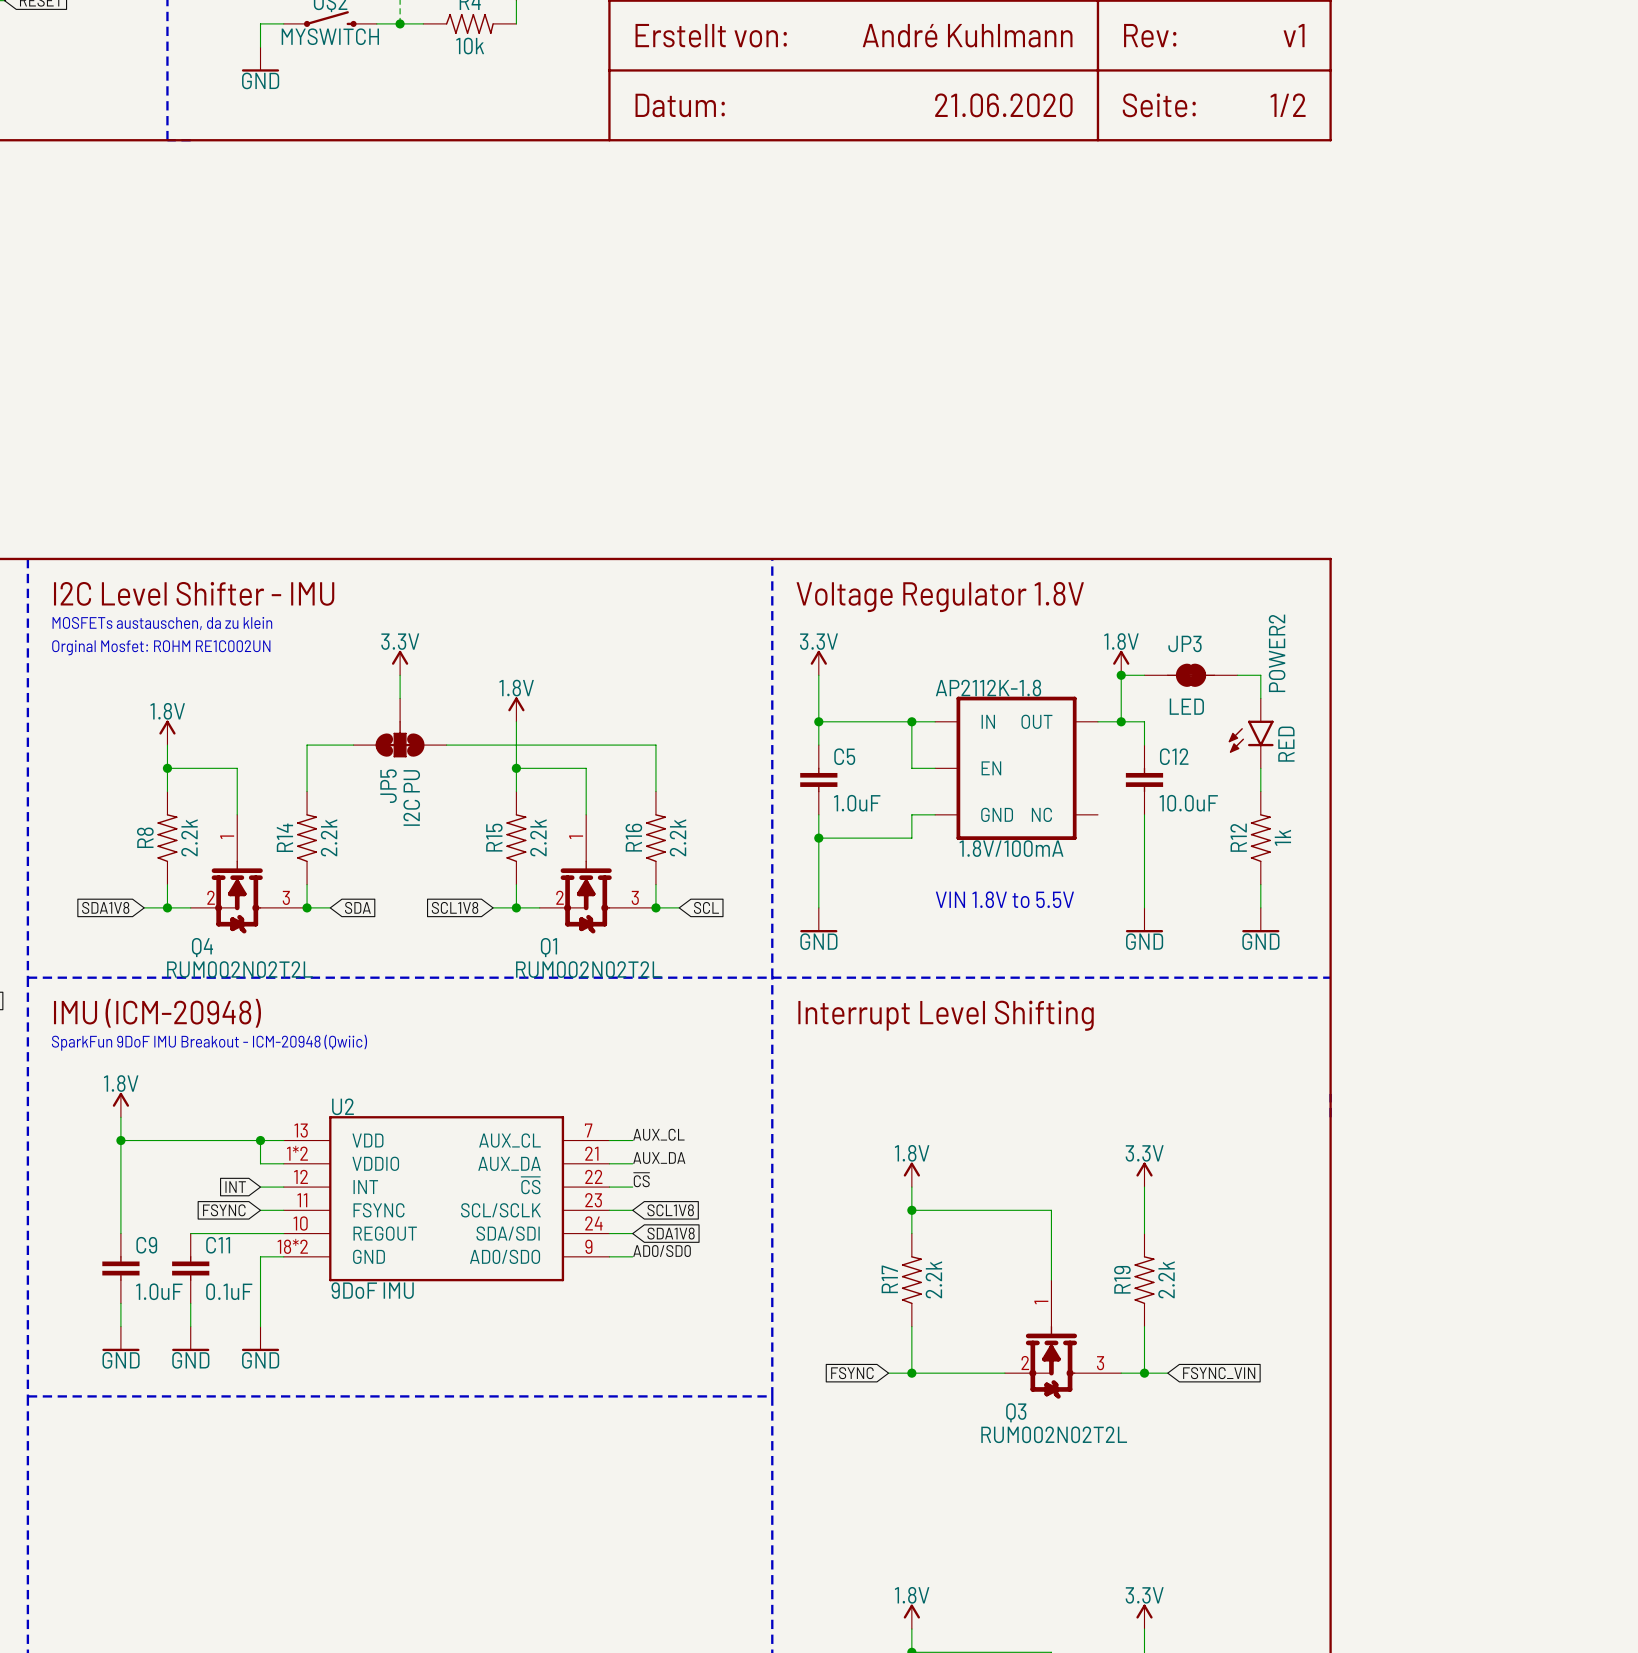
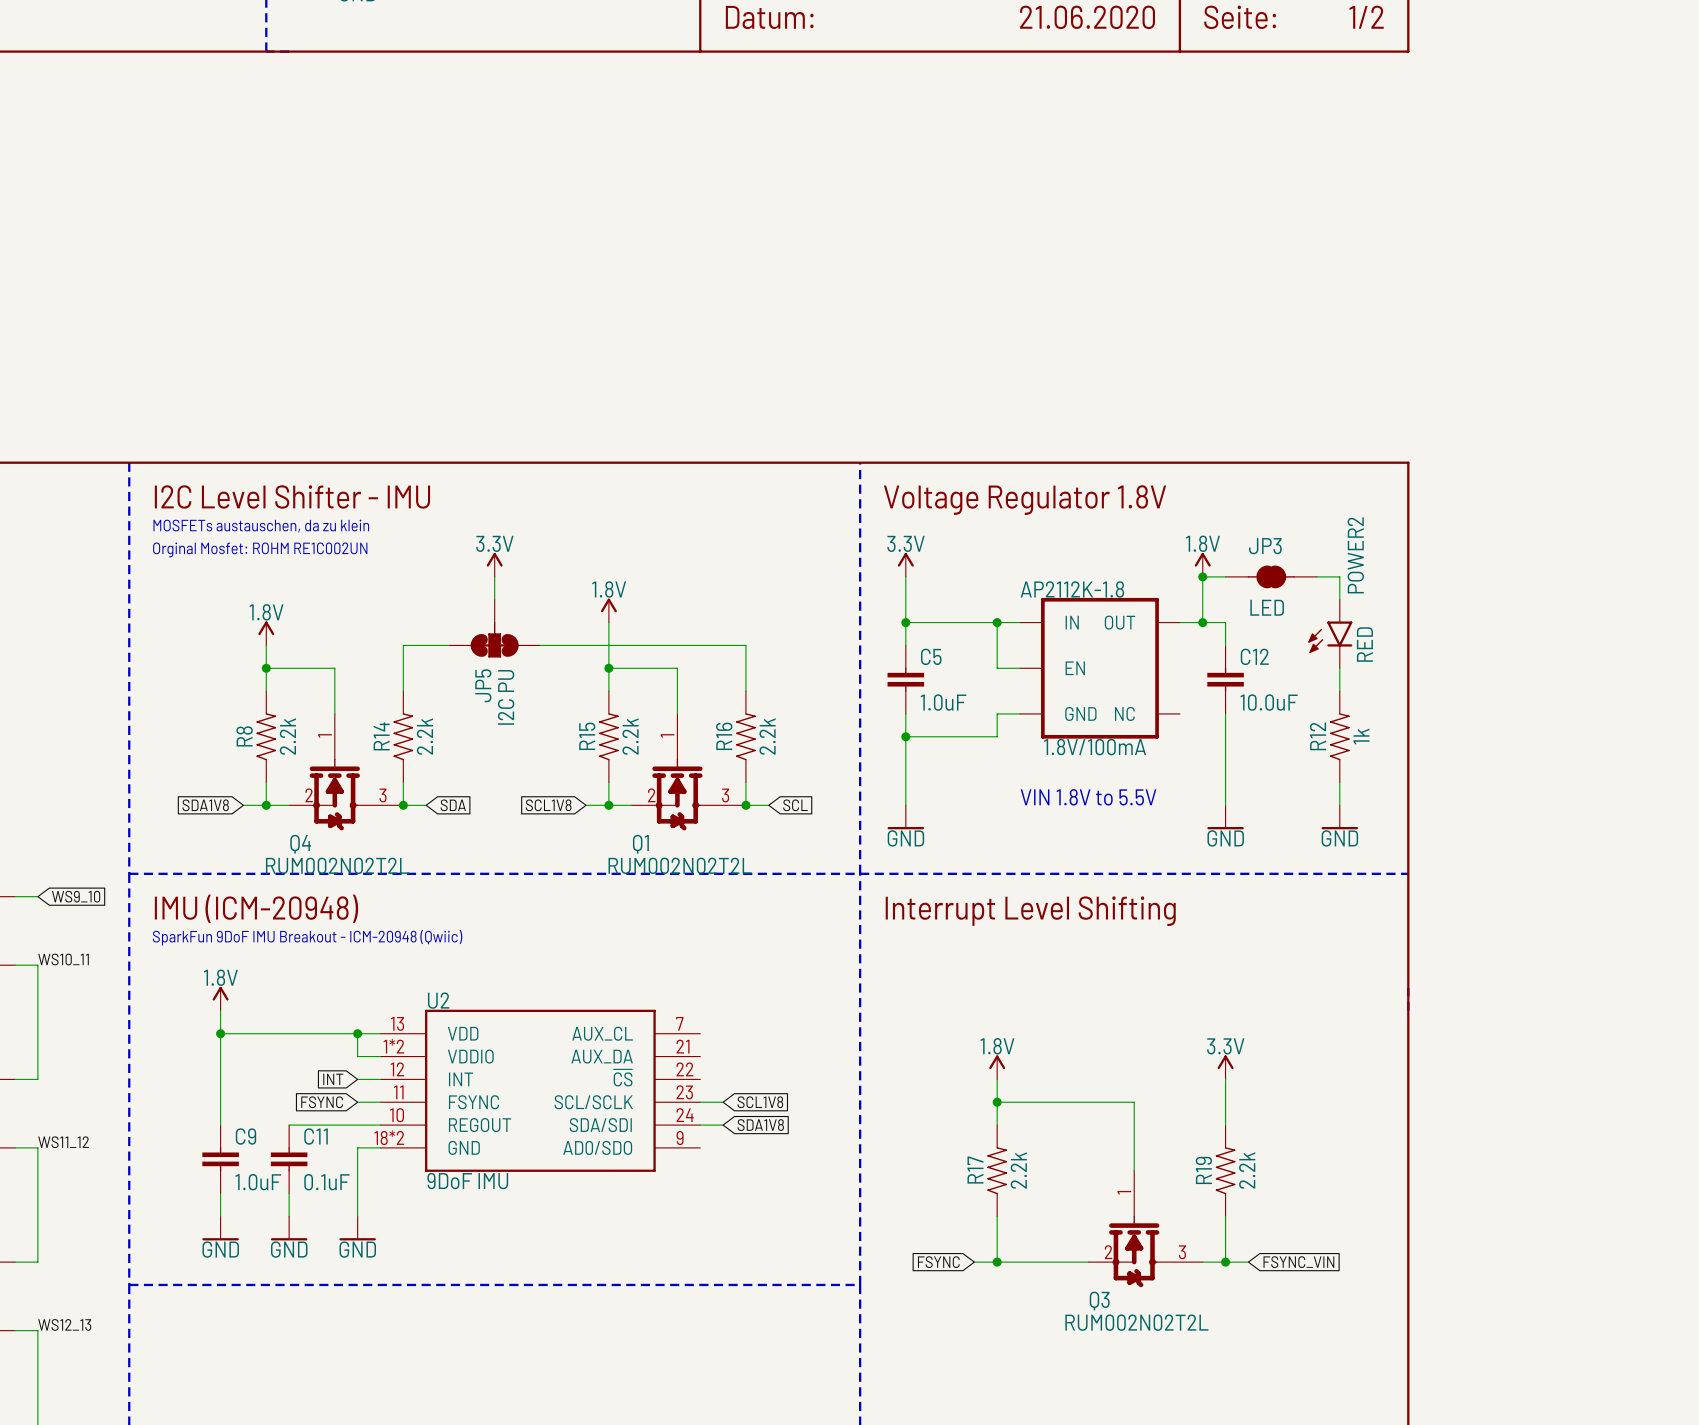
label: AUX_CL (658, 1134) -> none
wire: (609, 1140) (632, 1140) -> none
label: AUX_DA (659, 1158) -> none
wire: (609, 1163) (632, 1163) -> none
label: ~{CS} (641, 1179) -> none
wire: (609, 1187) (632, 1187) -> none
label: AD0/SD0 (662, 1251) -> none
wire: (609, 1256) (632, 1256) -> none

